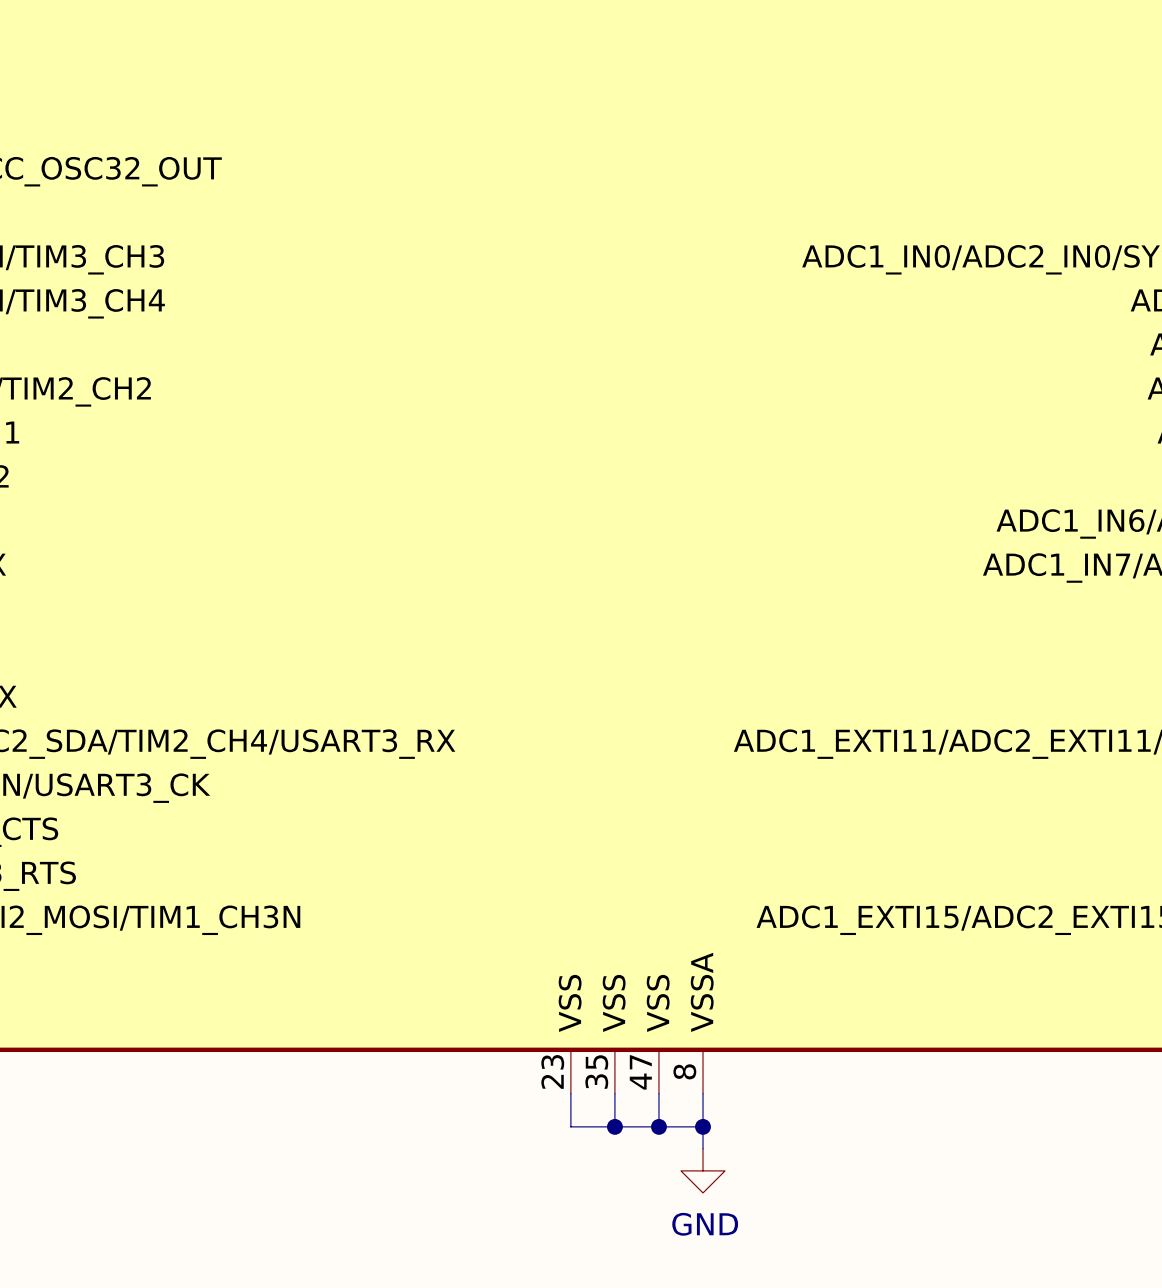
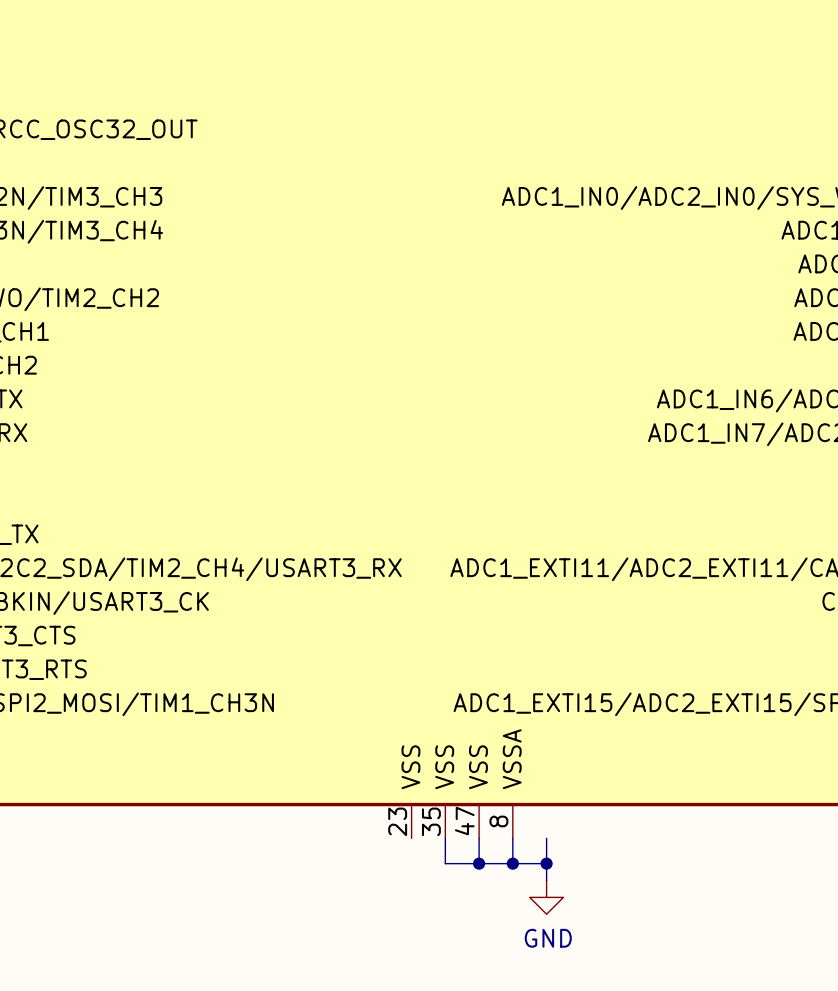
wire: (570, 1093) (570, 1126) (614, 1126) -> none
wire: none -> (546, 838) (546, 880)
junction: (614, 1126) -> none
wire: (703, 1126) (703, 1148) -> (512, 863) (546, 863)
junction: none -> (546, 863)
power symbol position: GND (703, 1170) -> GND (546, 897)

